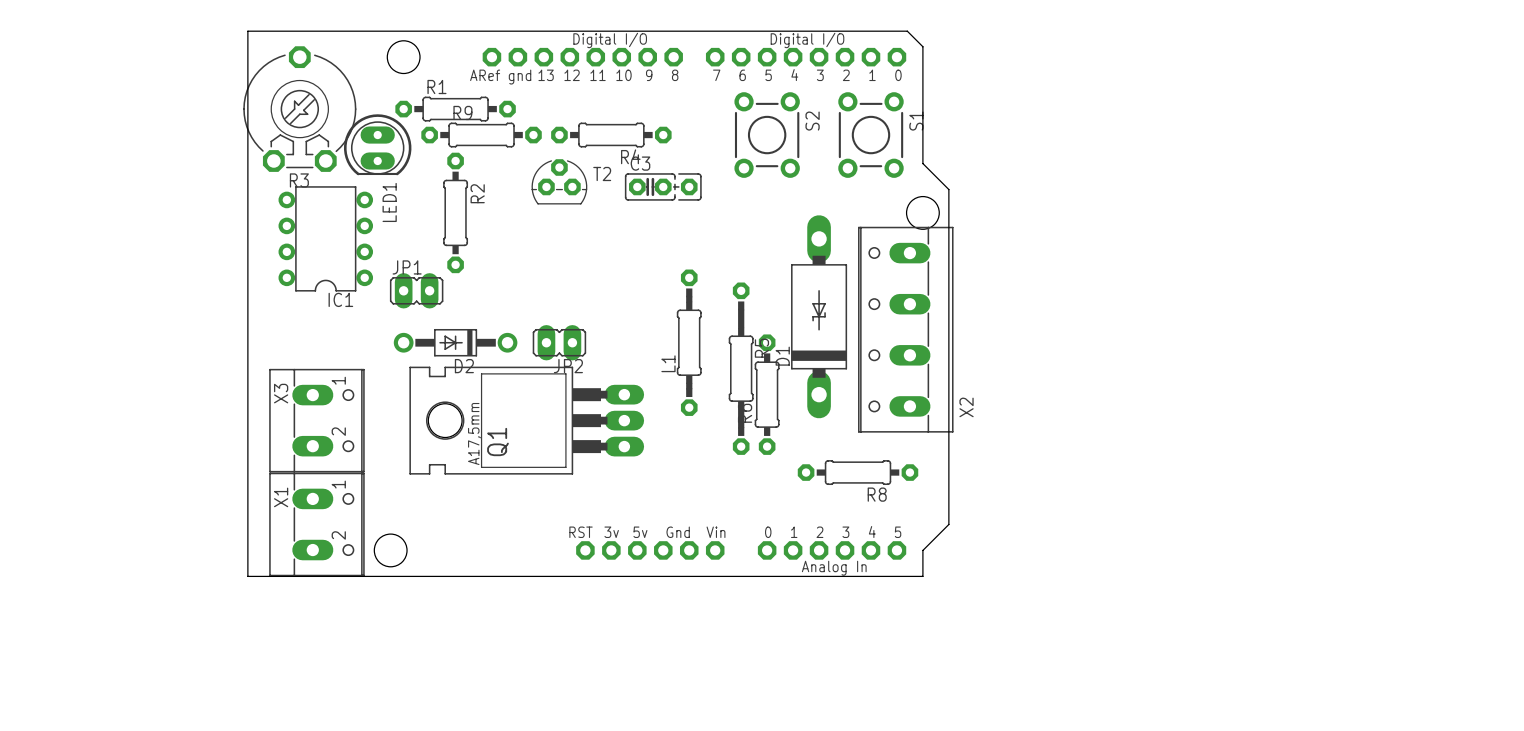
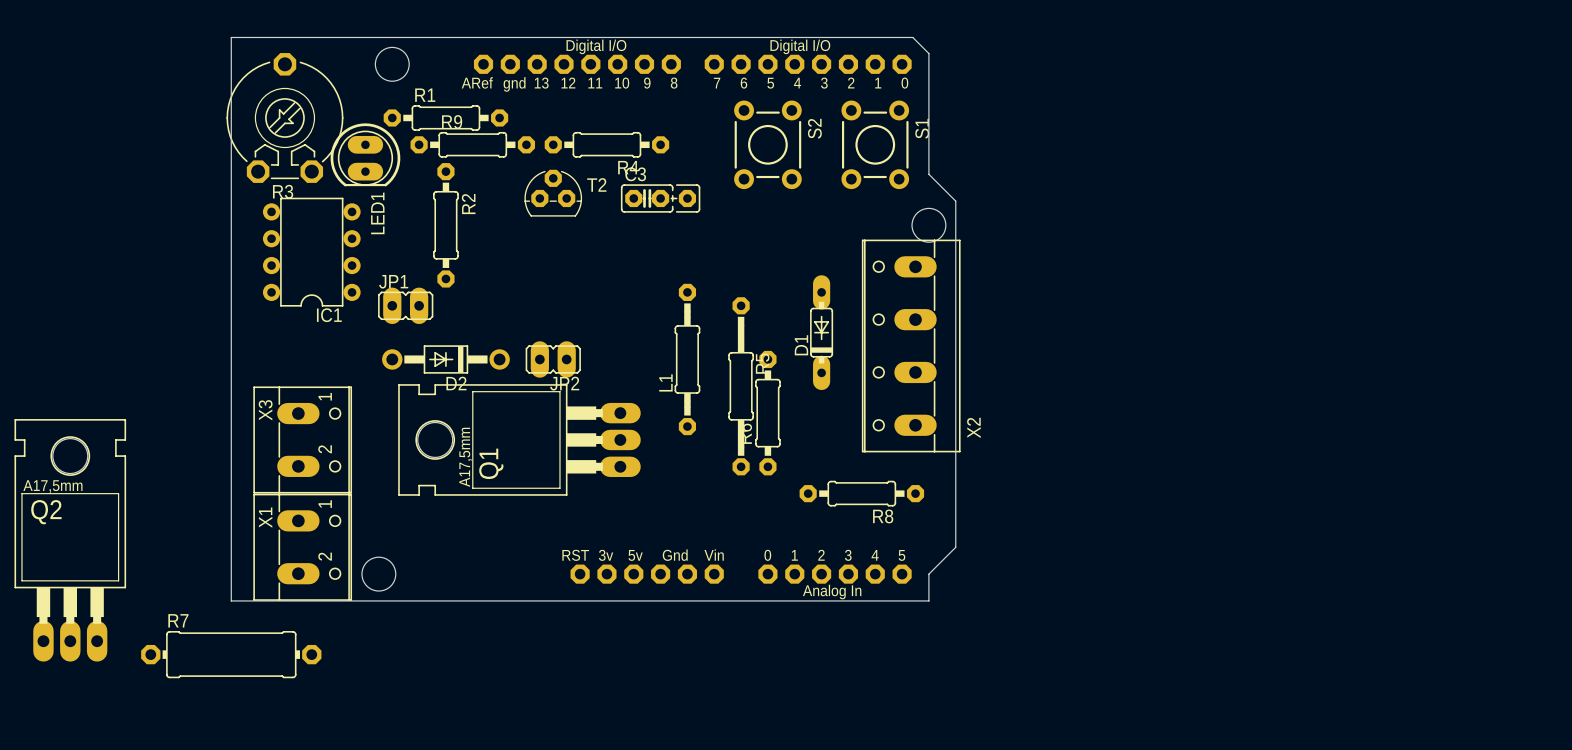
D1 footprint: [791, 215, 848, 419] -> [810, 275, 834, 391]
D1 name position: D1 (782, 356) -> D1 (801, 345)
Q2: none -> (70, 540)
R7: none -> (231, 654)

